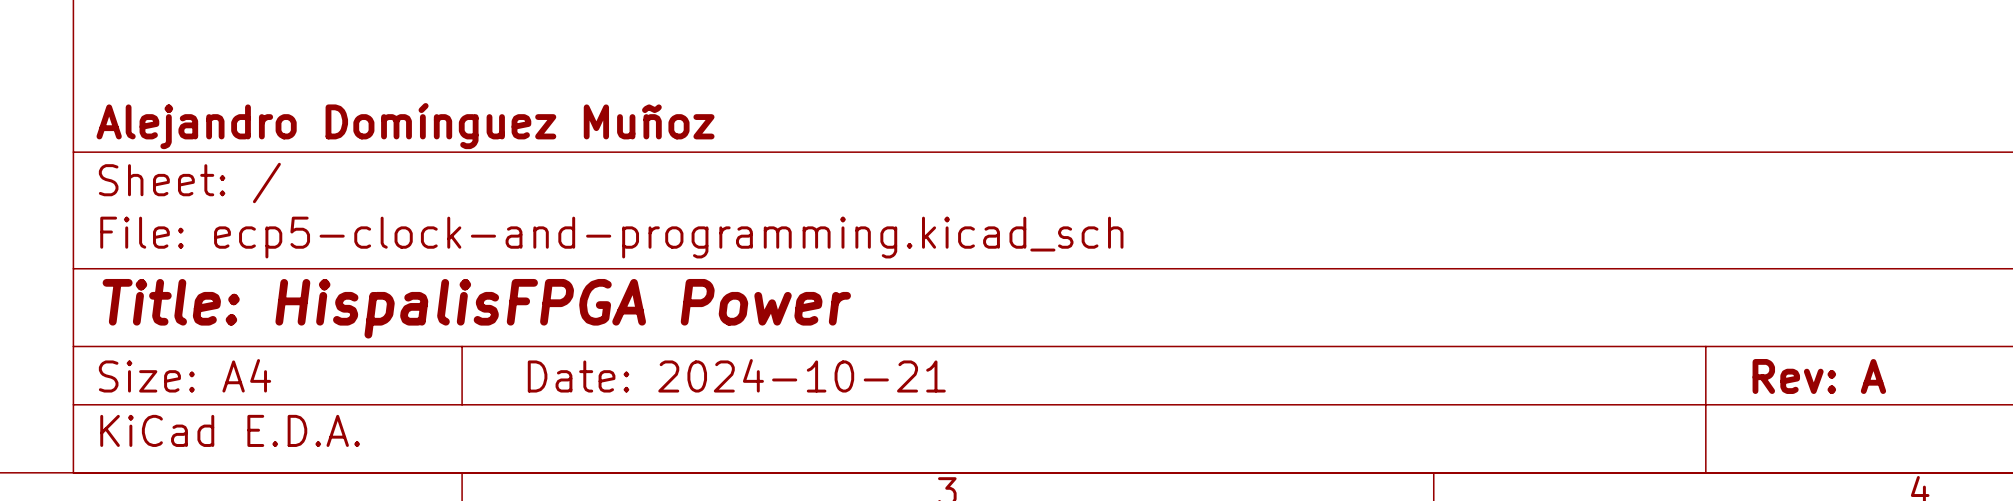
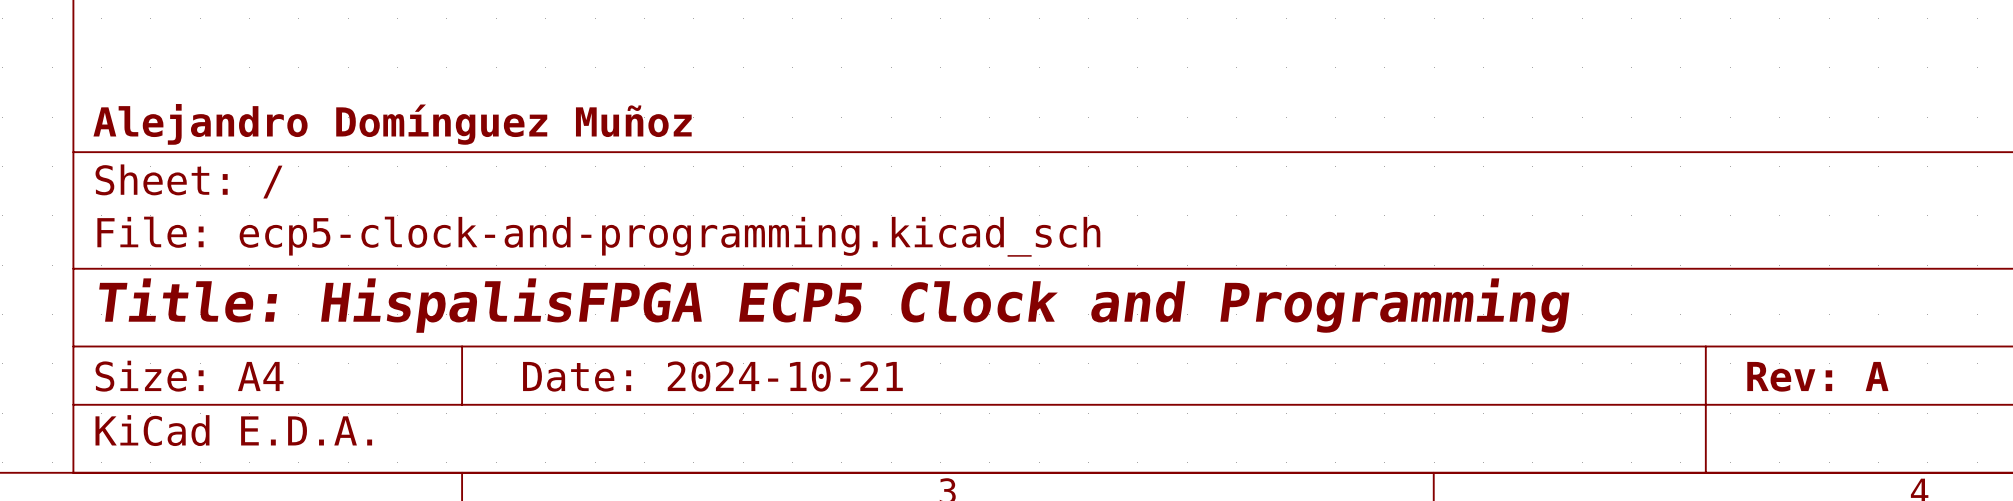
title block: Title: HispalisFPGA Power (476, 308) -> Title: HispalisFPGA ECP5 Clock and Programming (834, 305)

